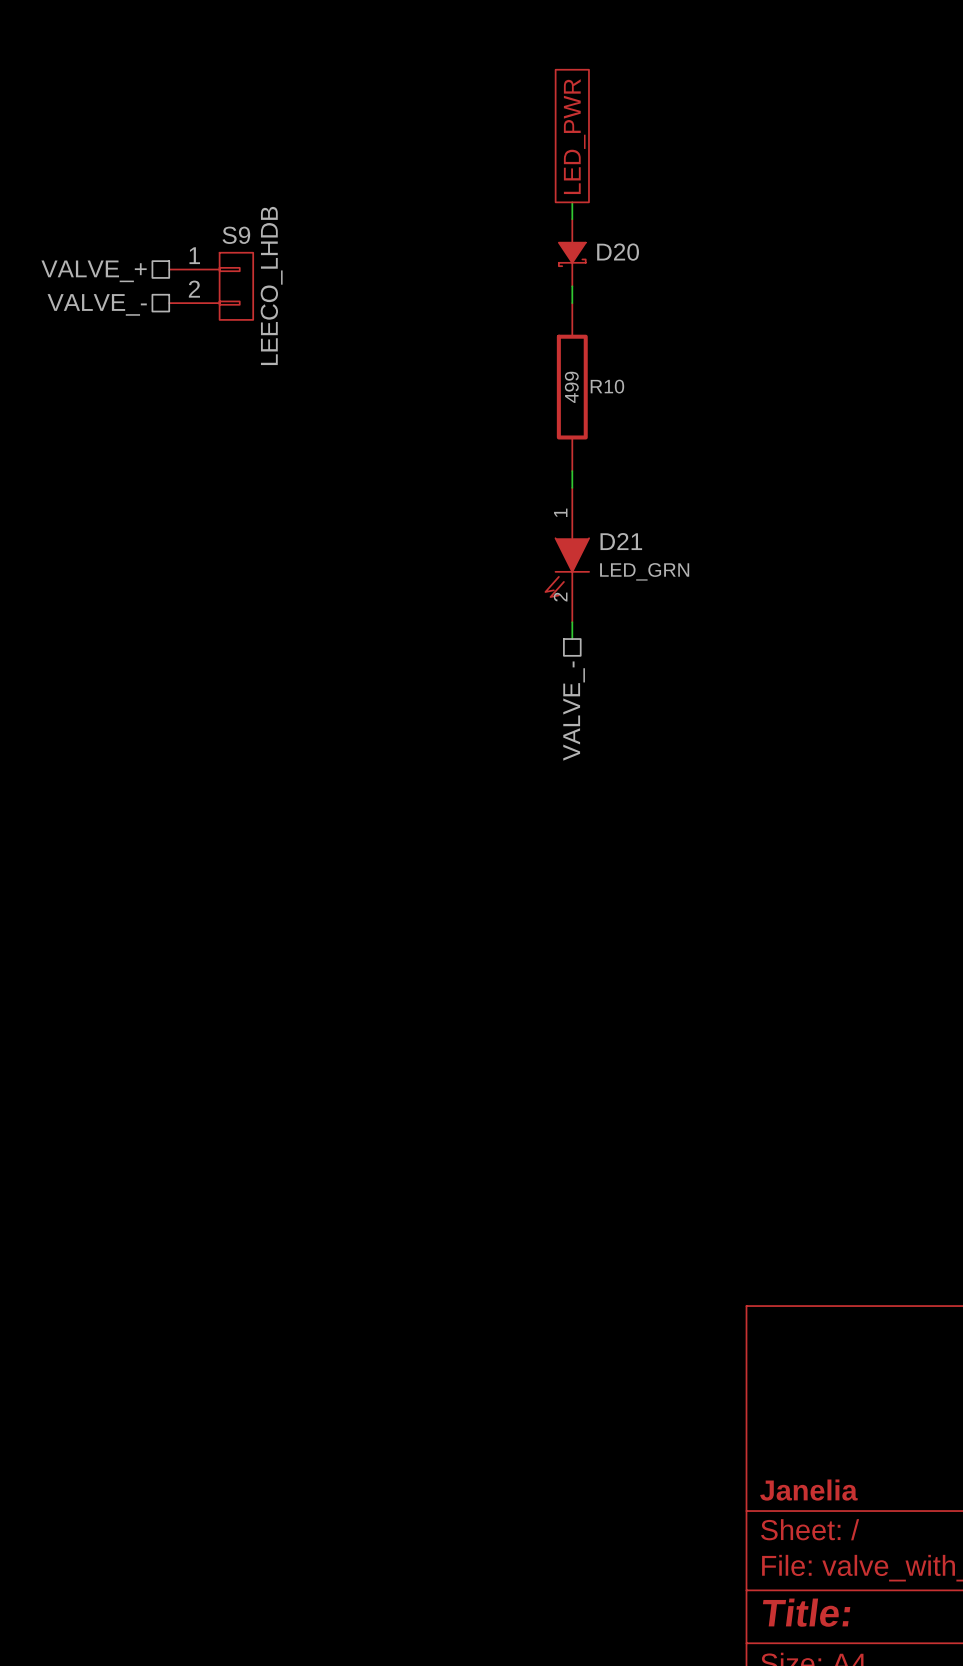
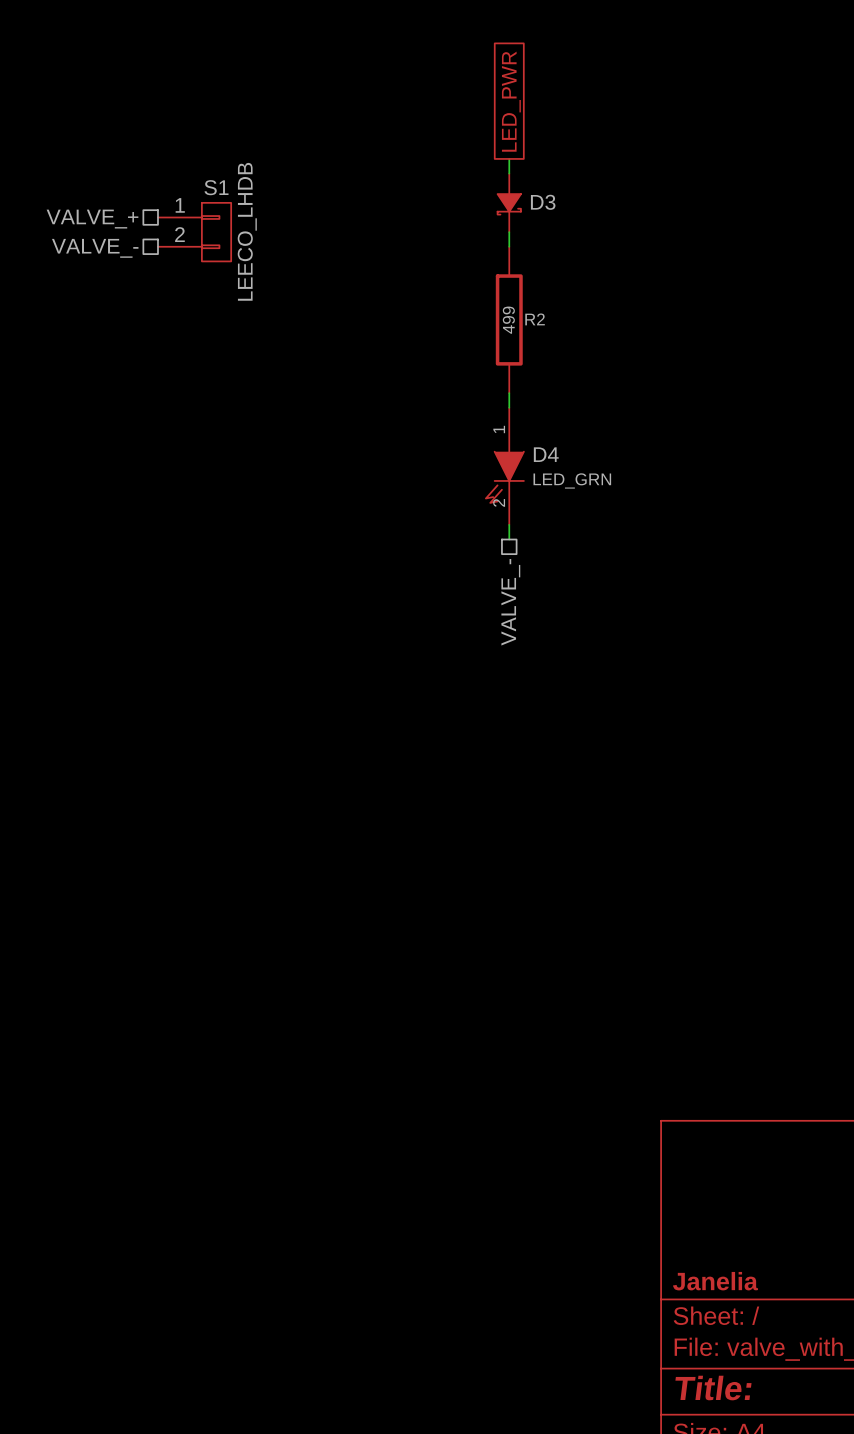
S9 name: S9 (236, 235) -> S1 (216, 187)
D20 name: D20 (618, 252) -> D3 (543, 202)
R10 name: R10 (607, 386) -> R2 (535, 319)
D21 name: D21 (621, 541) -> D4 (546, 454)

